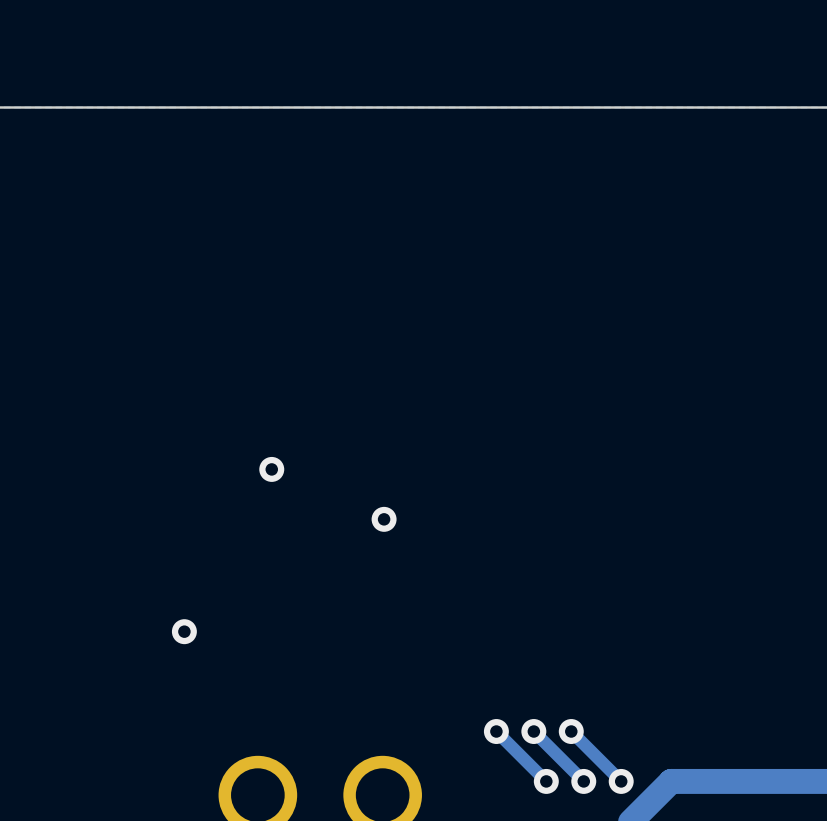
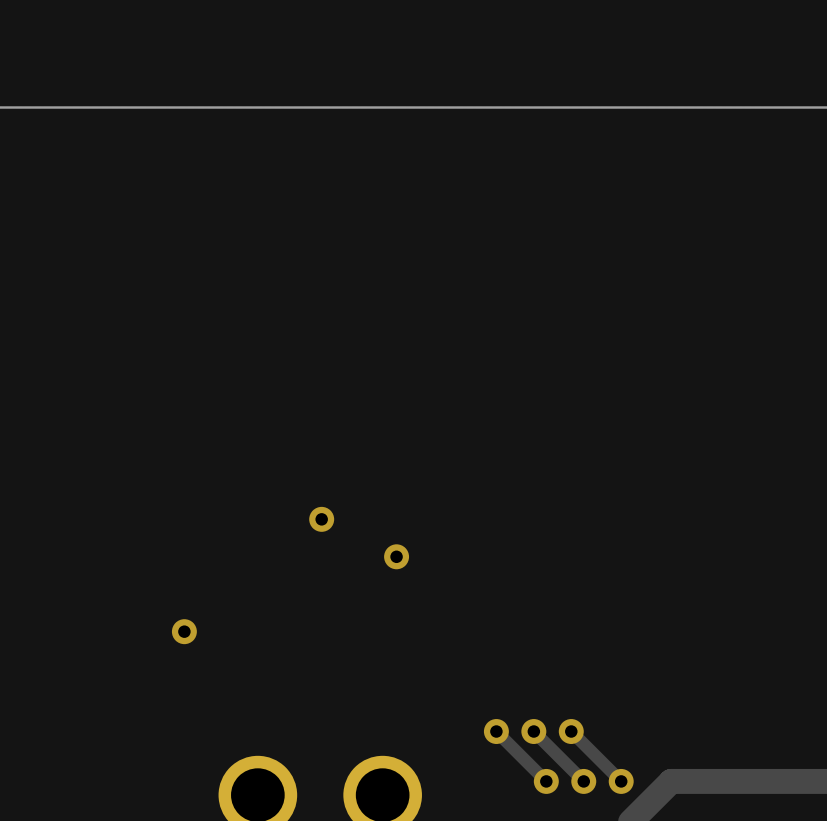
via: (271, 469) -> none
via: none -> (321, 519)
via: (384, 519) -> none
via: none -> (396, 556)

